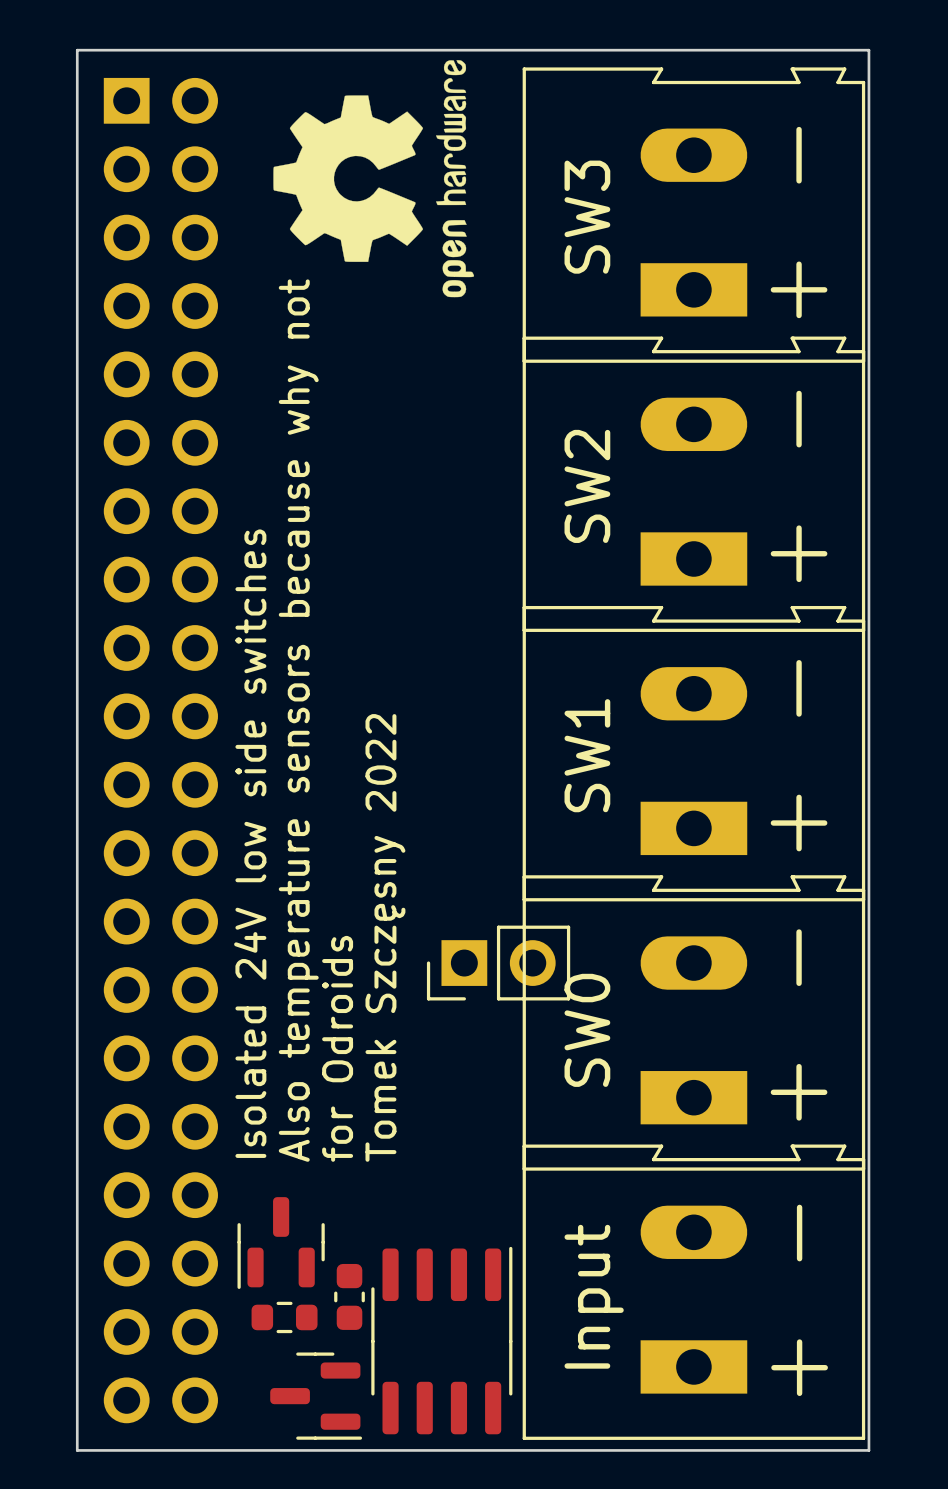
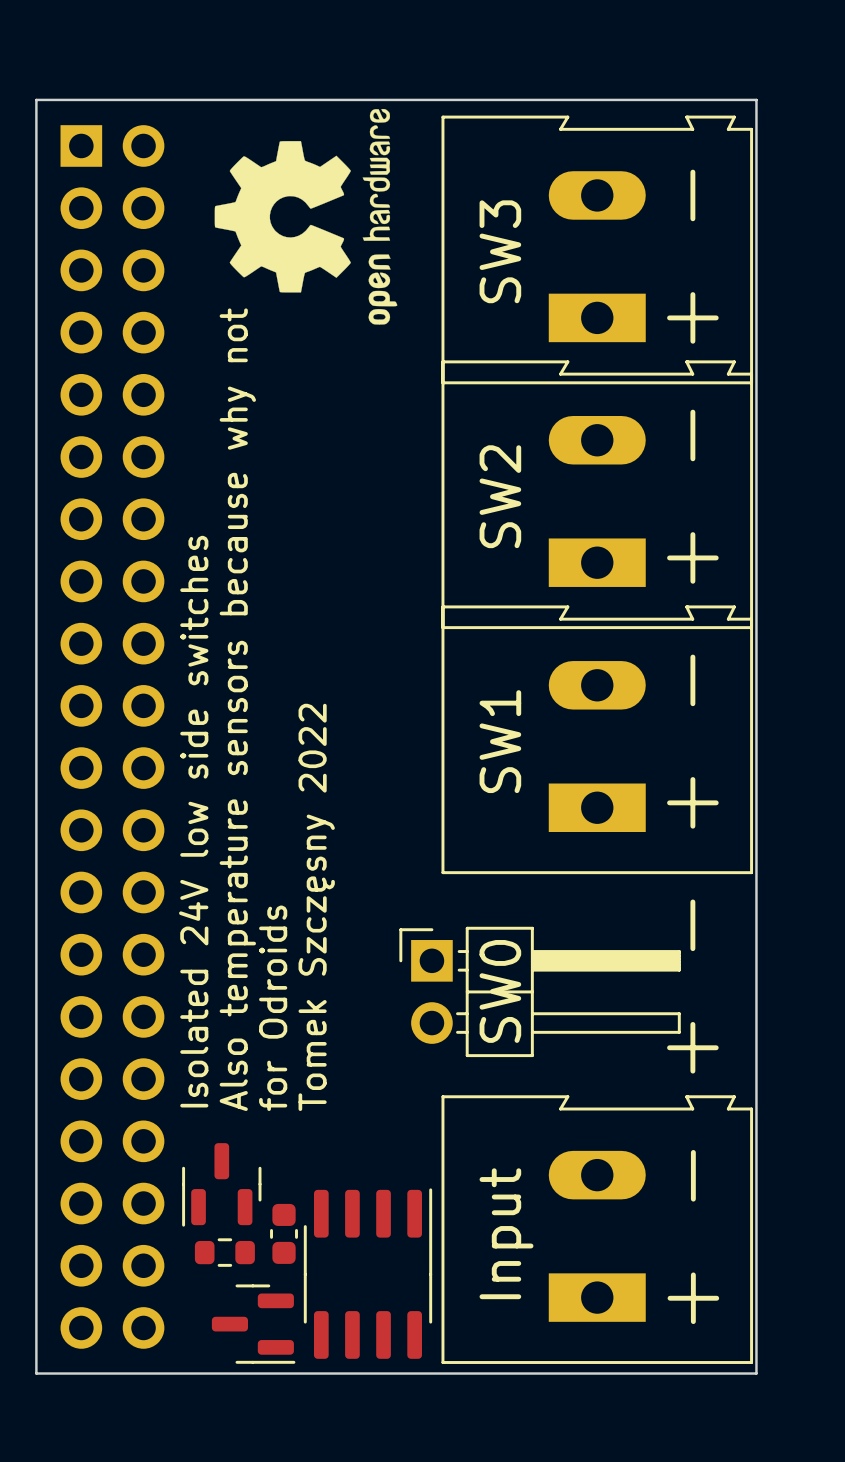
part: (498, 963) -> none
part: (693, 1022) -> none
part: none -> (540, 991)

